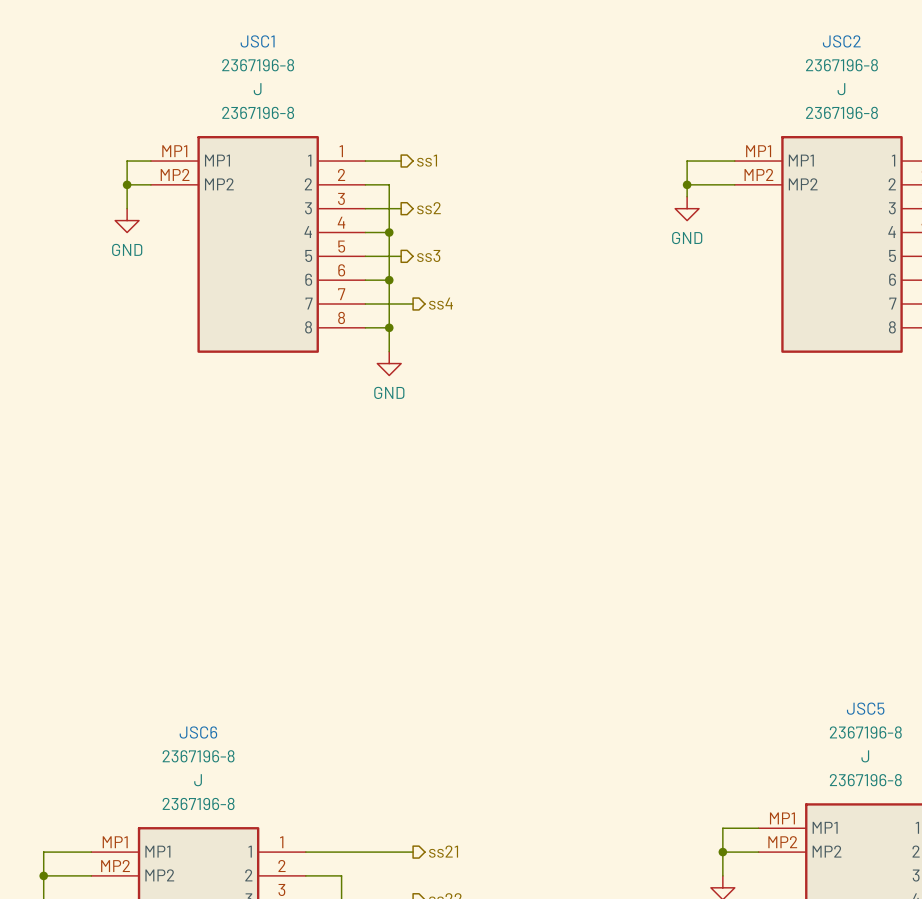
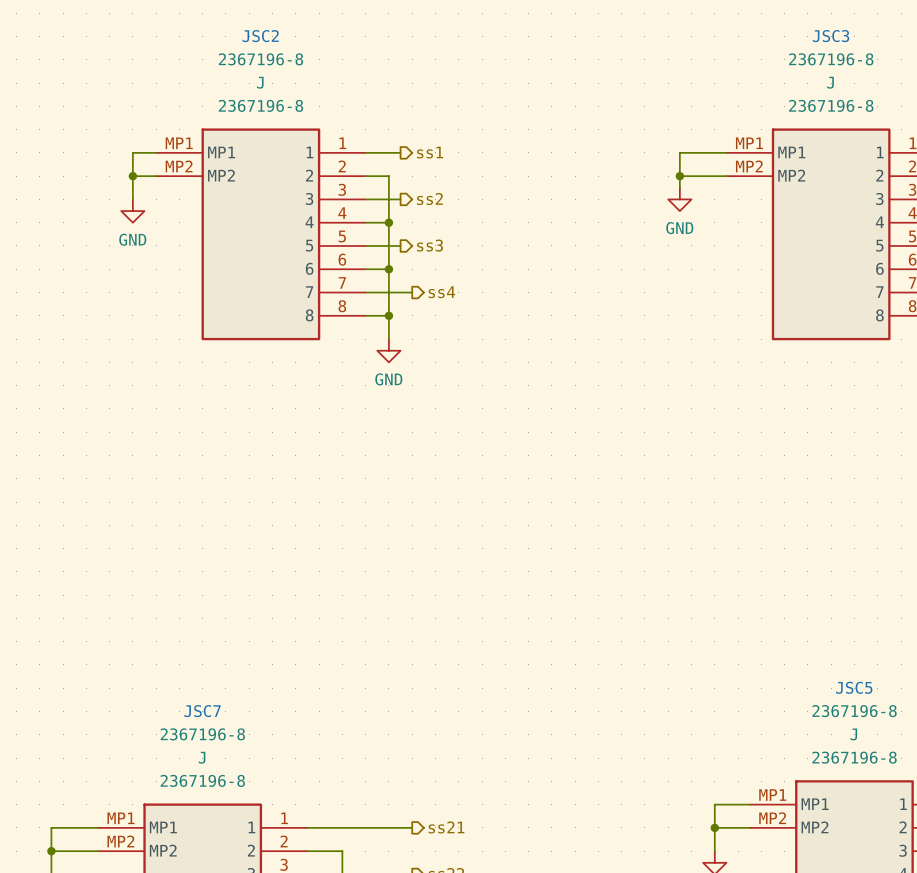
JSC1 name: JSC1 (257, 41) -> JSC2 (260, 36)
JSC2 name: JSC2 (841, 41) -> JSC3 (831, 36)
JSC6 name: JSC6 (198, 732) -> JSC7 (202, 711)

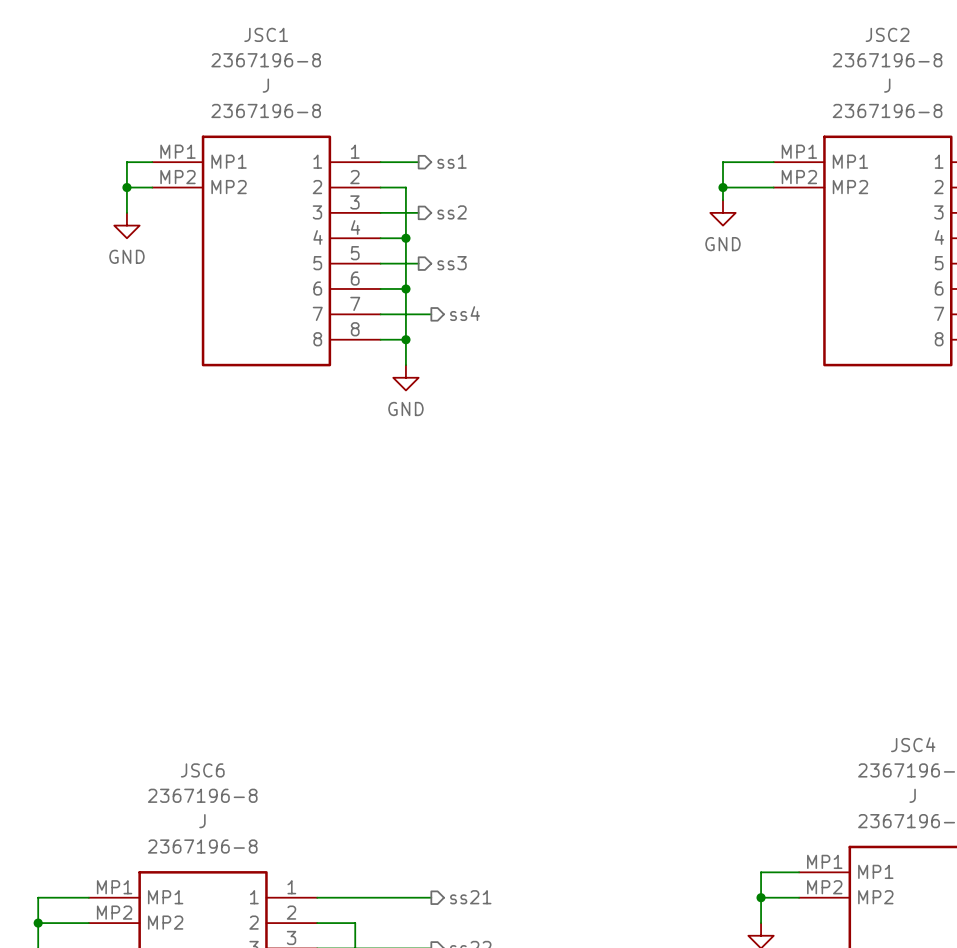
JSC2 name: JSC2 (260, 36) -> JSC1 (266, 34)
JSC3 name: JSC3 (831, 36) -> JSC2 (887, 34)
JSC5 name: JSC5 (854, 687) -> JSC4 (913, 744)
JSC7 name: JSC7 (202, 711) -> JSC6 (202, 770)

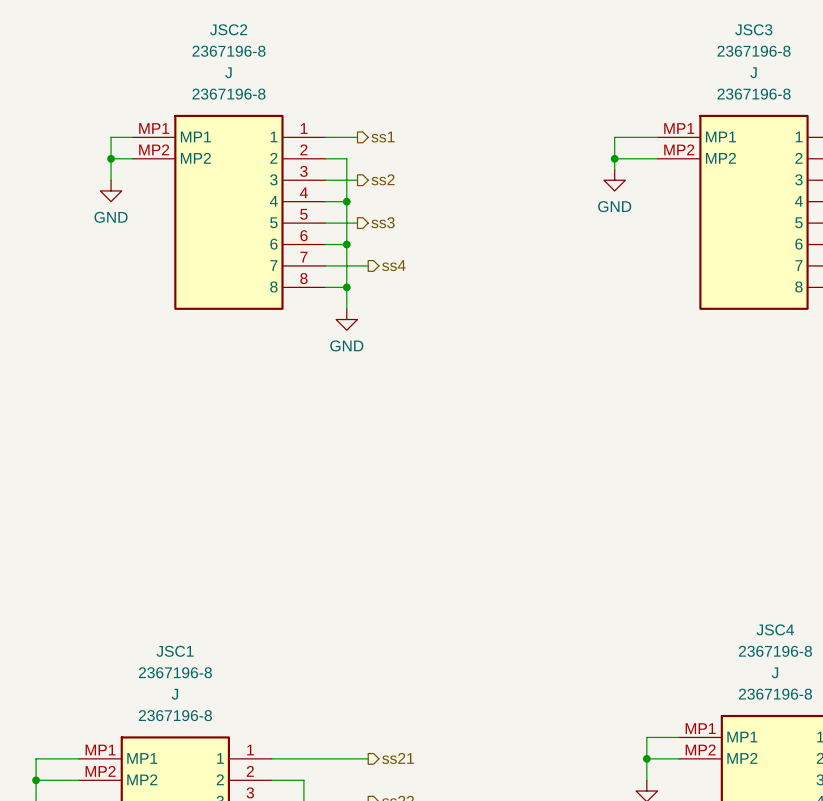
JSC1 name: JSC1 (266, 34) -> JSC2 (228, 29)
JSC2 name: JSC2 (887, 34) -> JSC3 (753, 29)
JSC6 name: JSC6 (202, 770) -> JSC1 (175, 651)

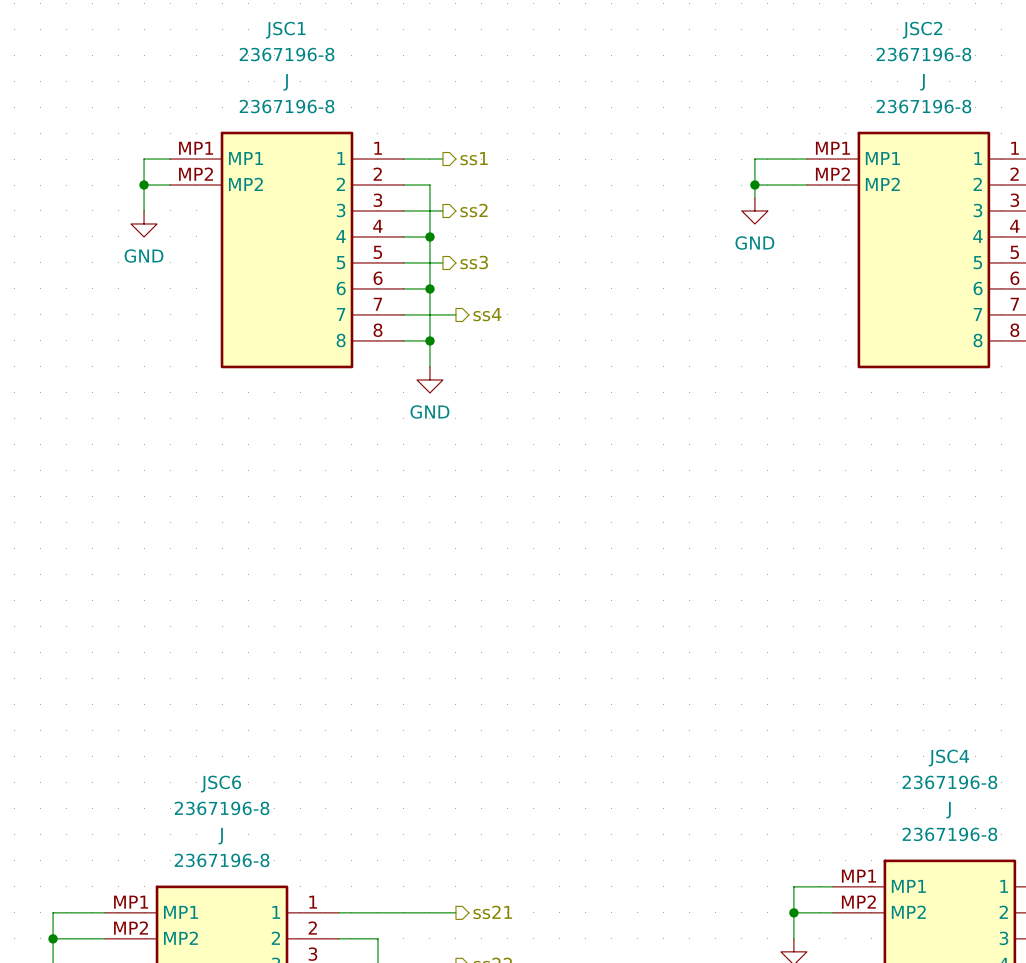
JSC2 name: JSC2 (228, 29) -> JSC1 (285, 30)
JSC3 name: JSC3 (753, 29) -> JSC2 (922, 30)
JSC1 name: JSC1 (175, 651) -> JSC6 (220, 784)

